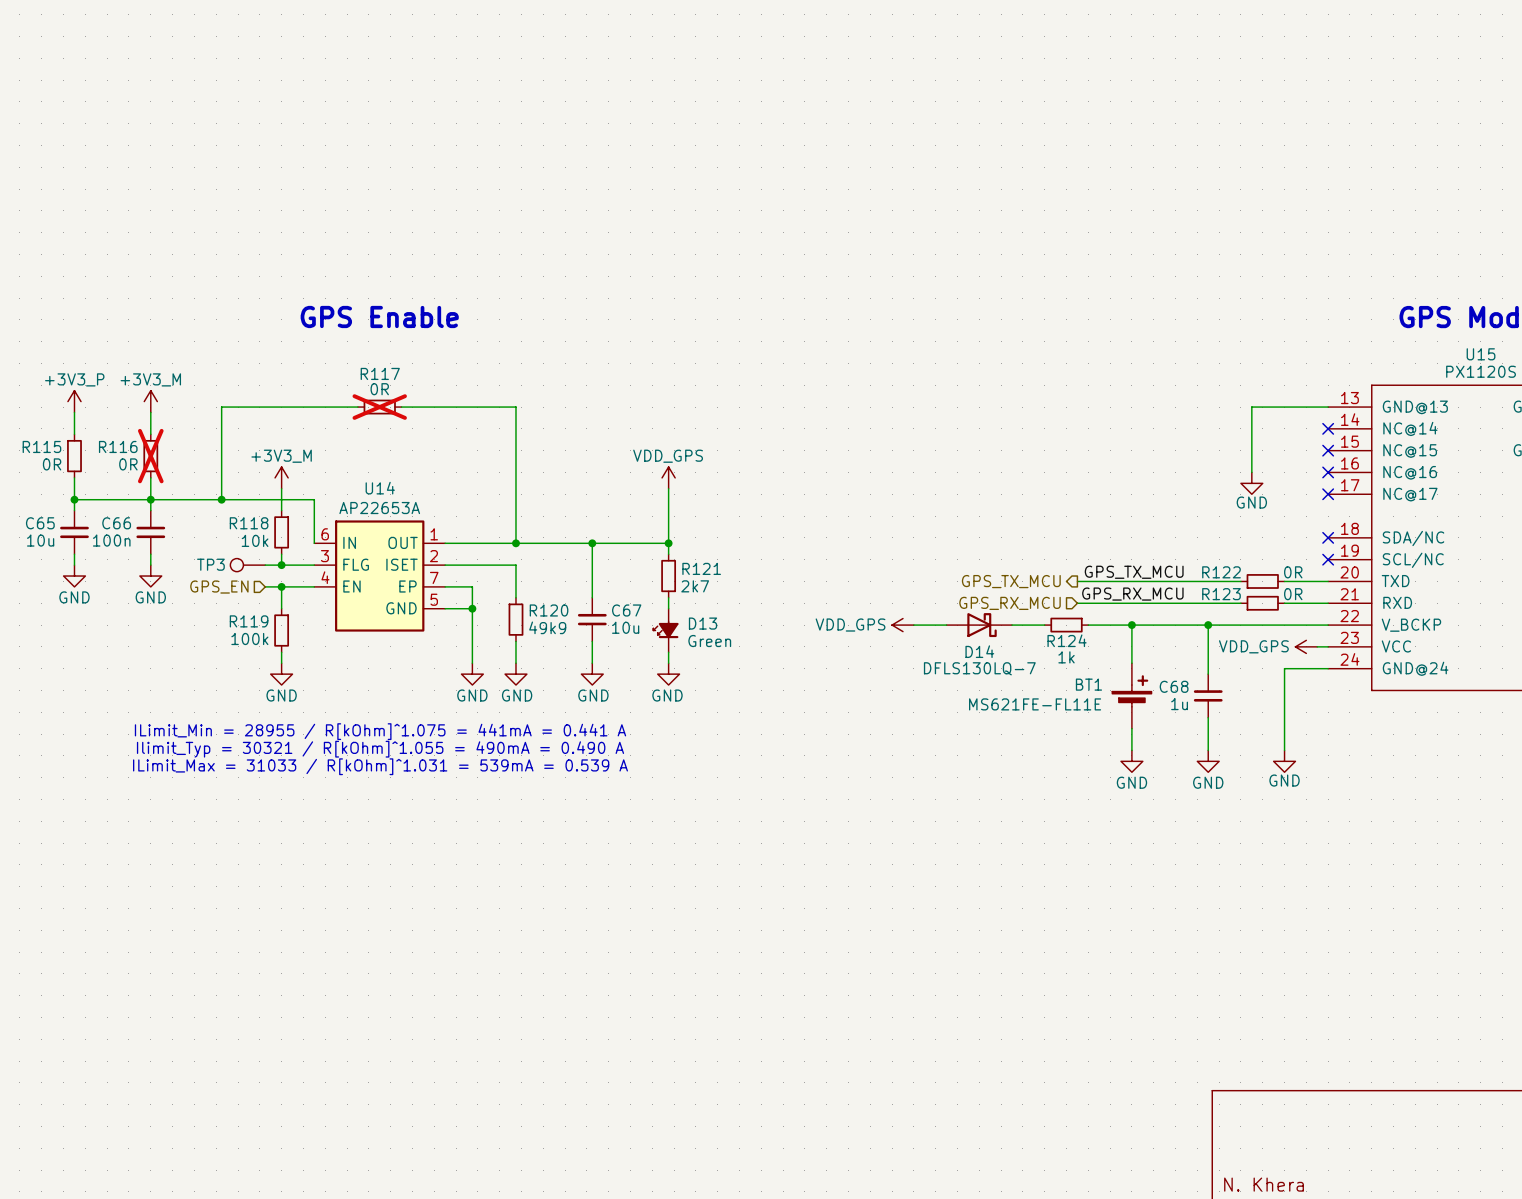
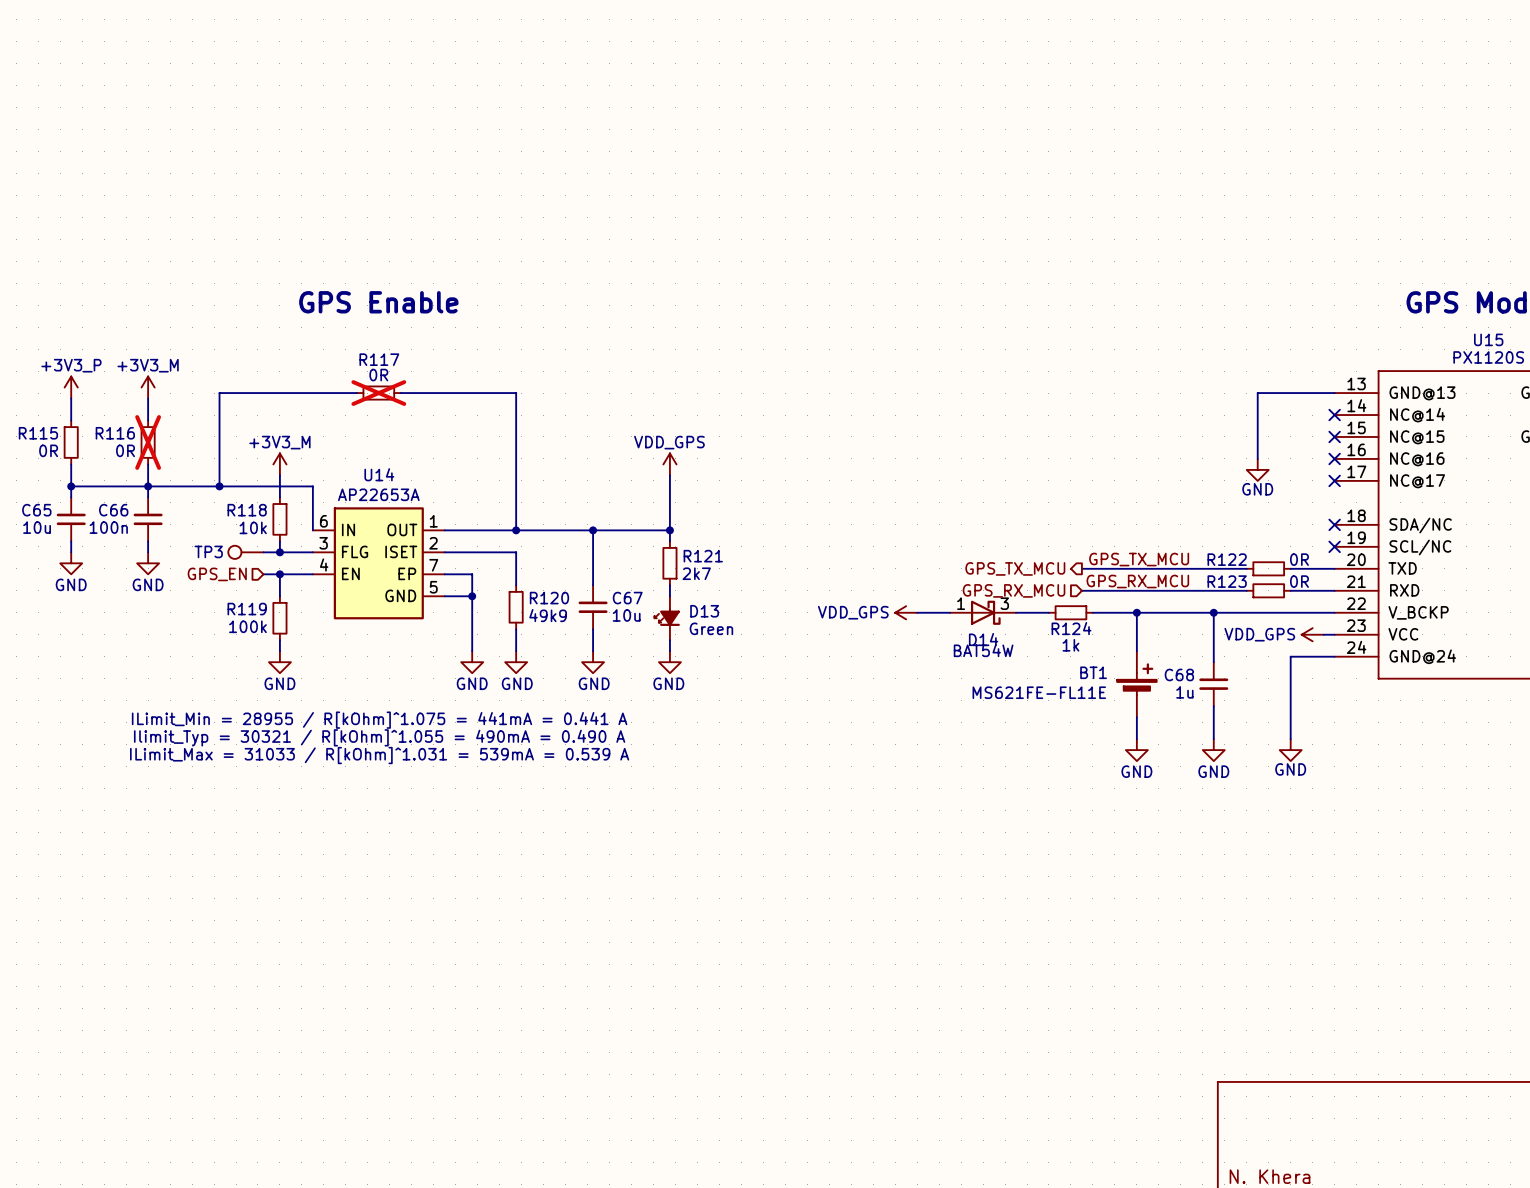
D14 pin number: none -> 1 (961, 603)
D14 pin number: none -> 3 (1004, 603)
D14 value: DFLS130LQ-7 (979, 668) -> BAT54W (983, 650)

